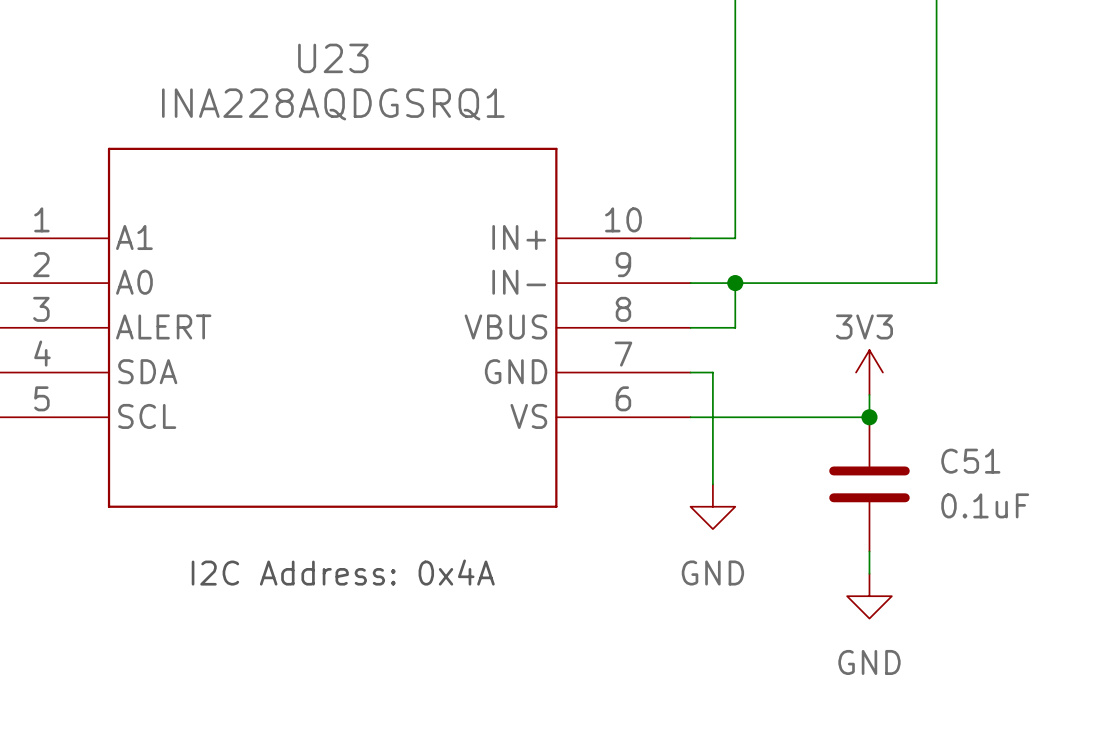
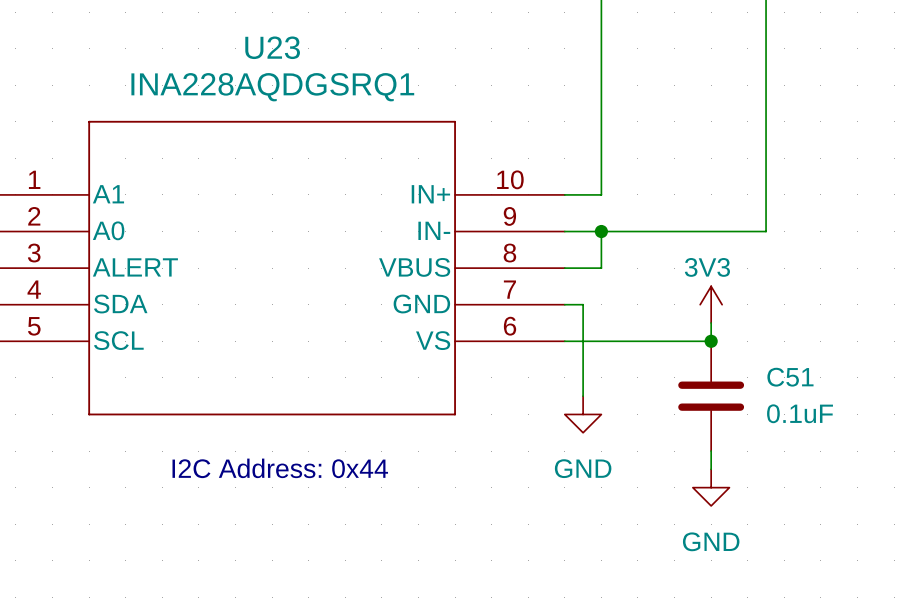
text: I2C Address: 0x4A (343, 572) -> I2C Address: 0x44 (280, 468)

